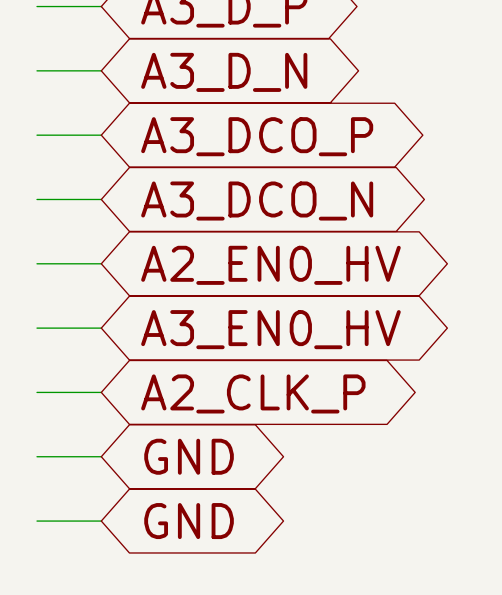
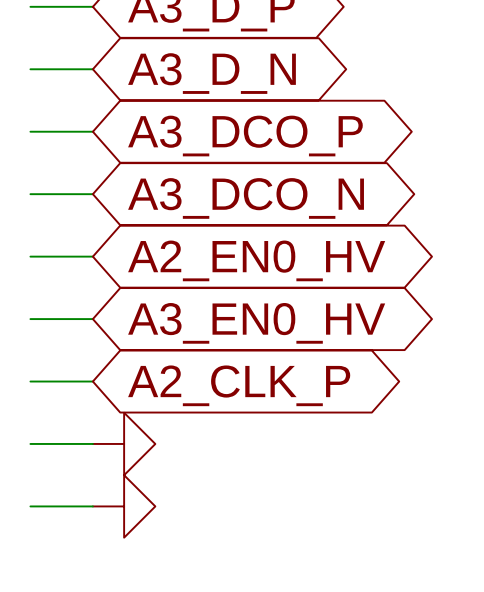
power symbol: none -> (124, 443)
global label: GND (189, 456) -> none
power symbol: none -> (124, 506)
global label: GND (189, 521) -> none

